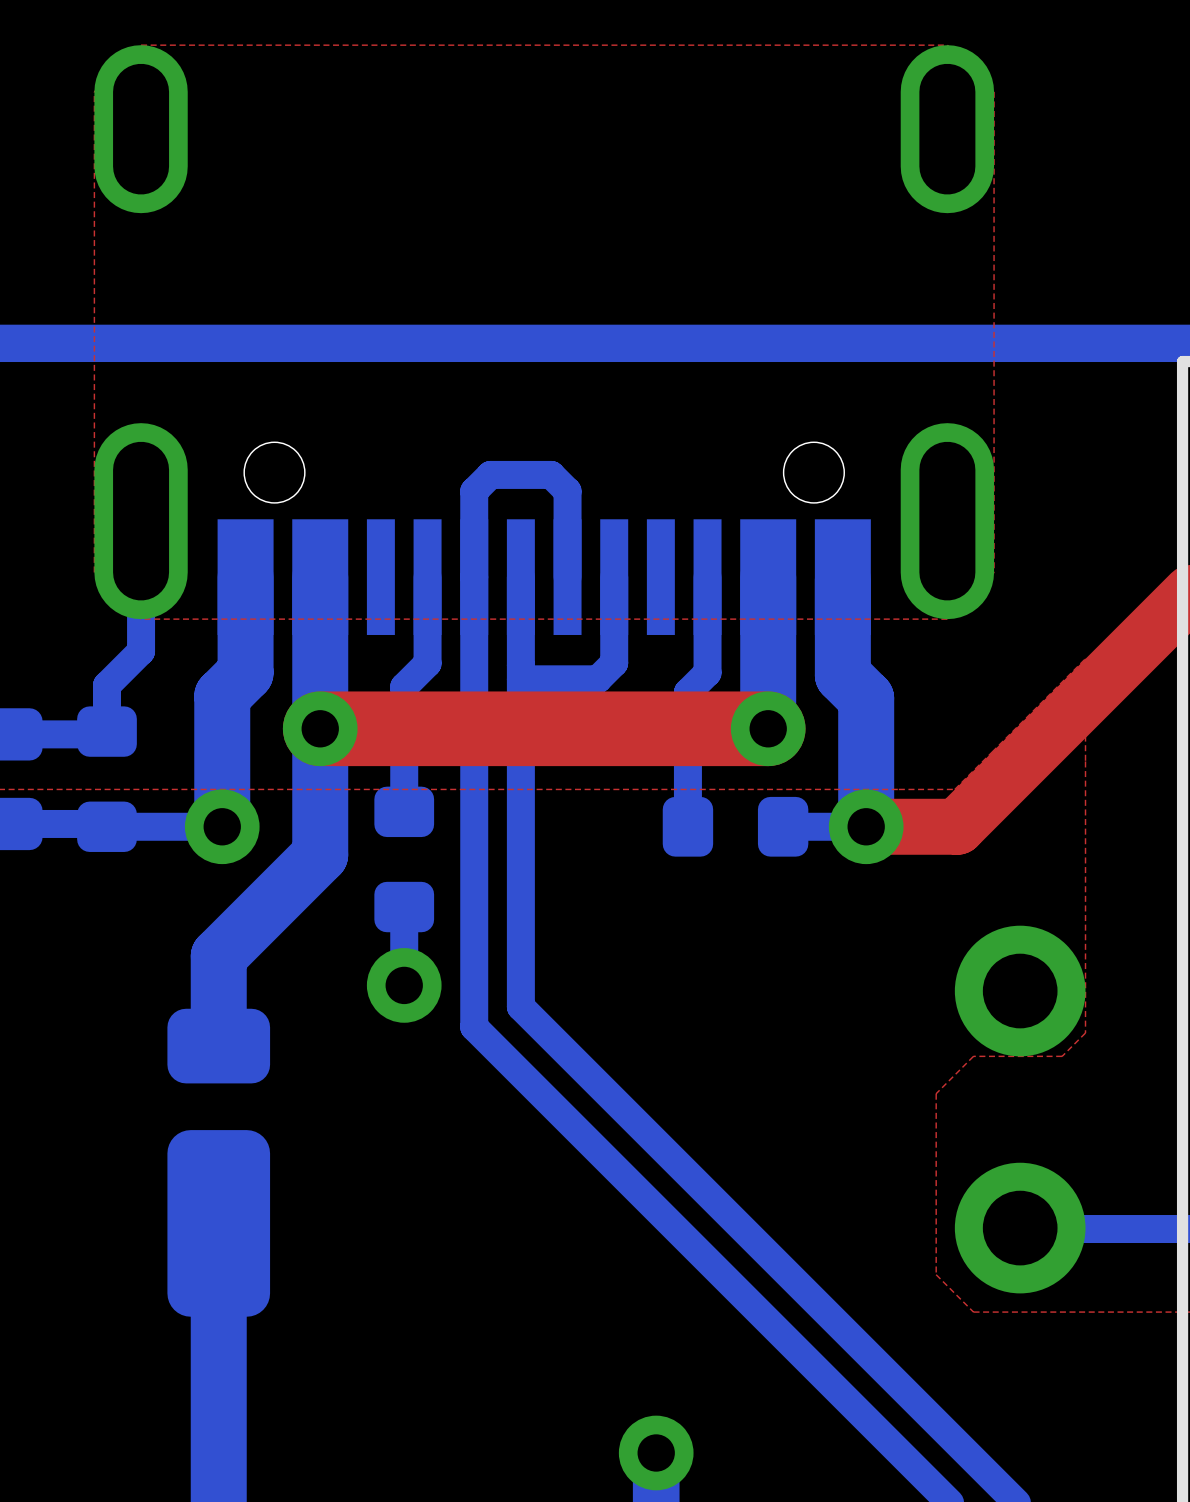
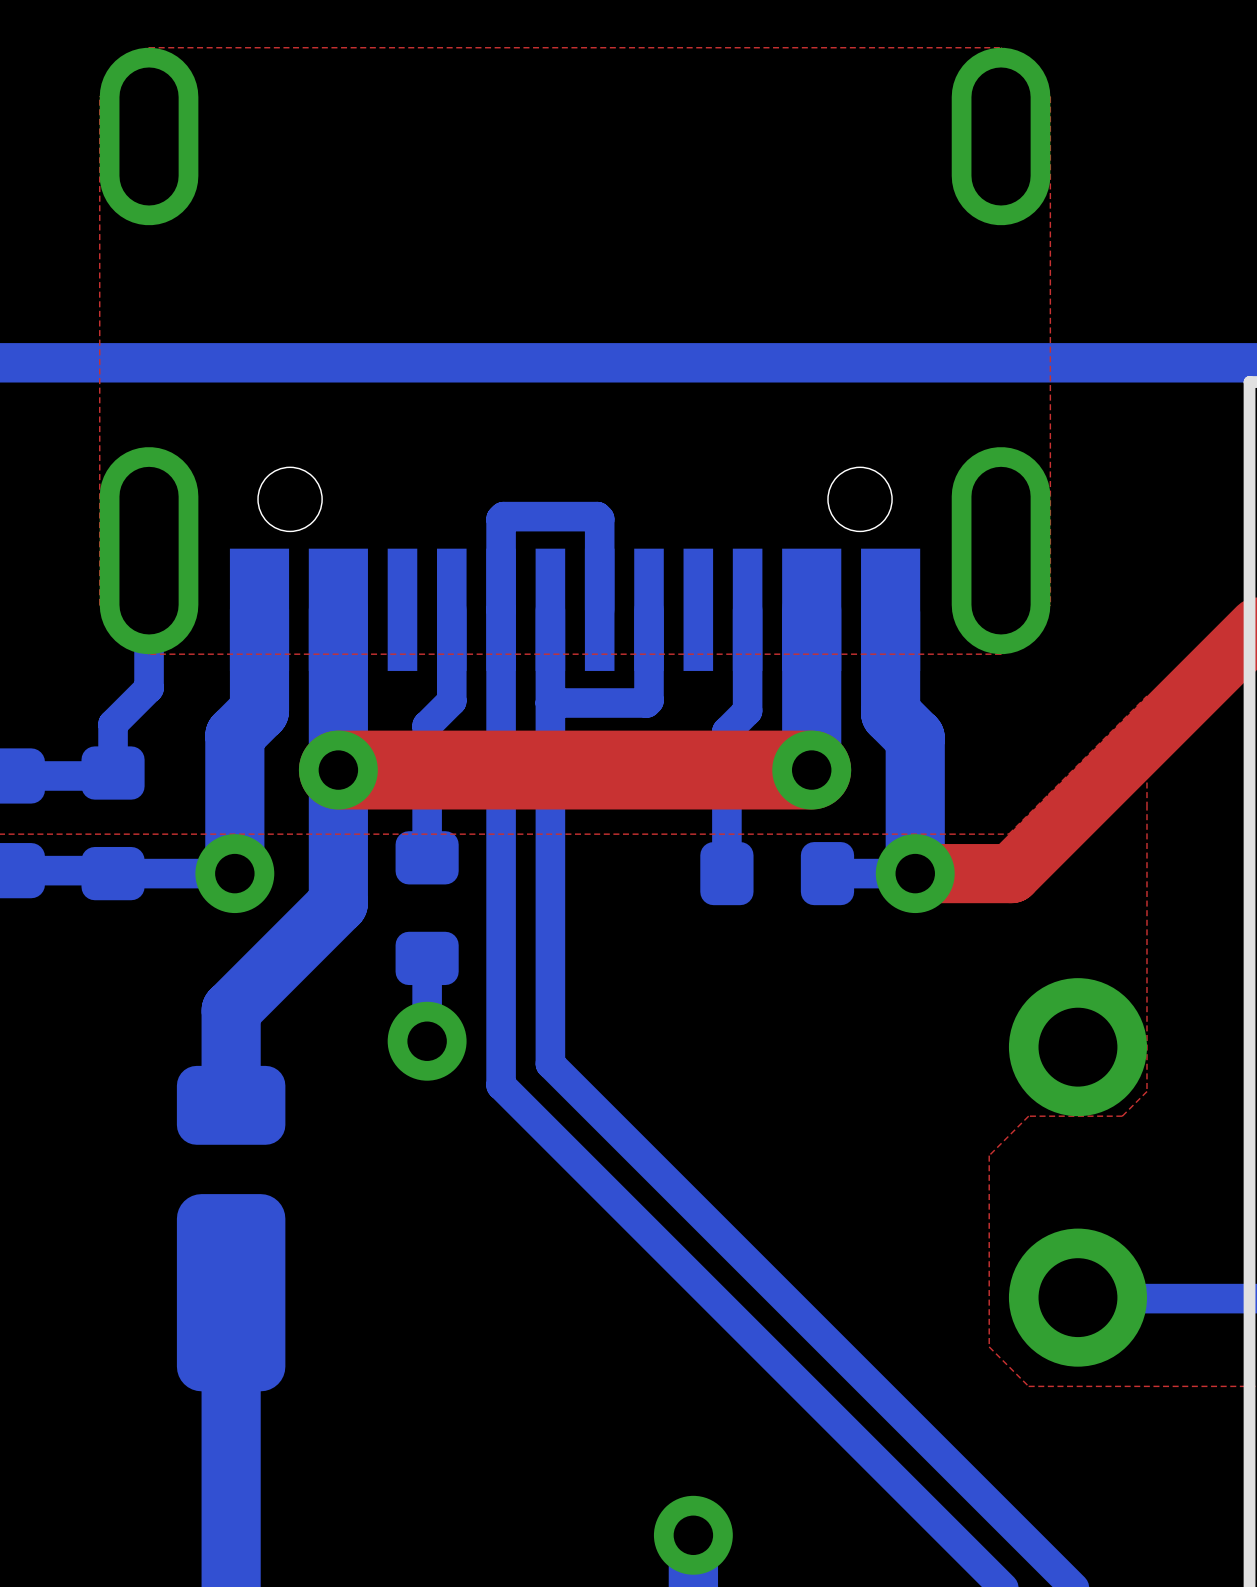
bottom track: (476, 488) (490, 474) (551, 474) (565, 488) -> (503, 516) (597, 516)
bottom track: (611, 665) (597, 679) (520, 679) -> (646, 703) (550, 703)

